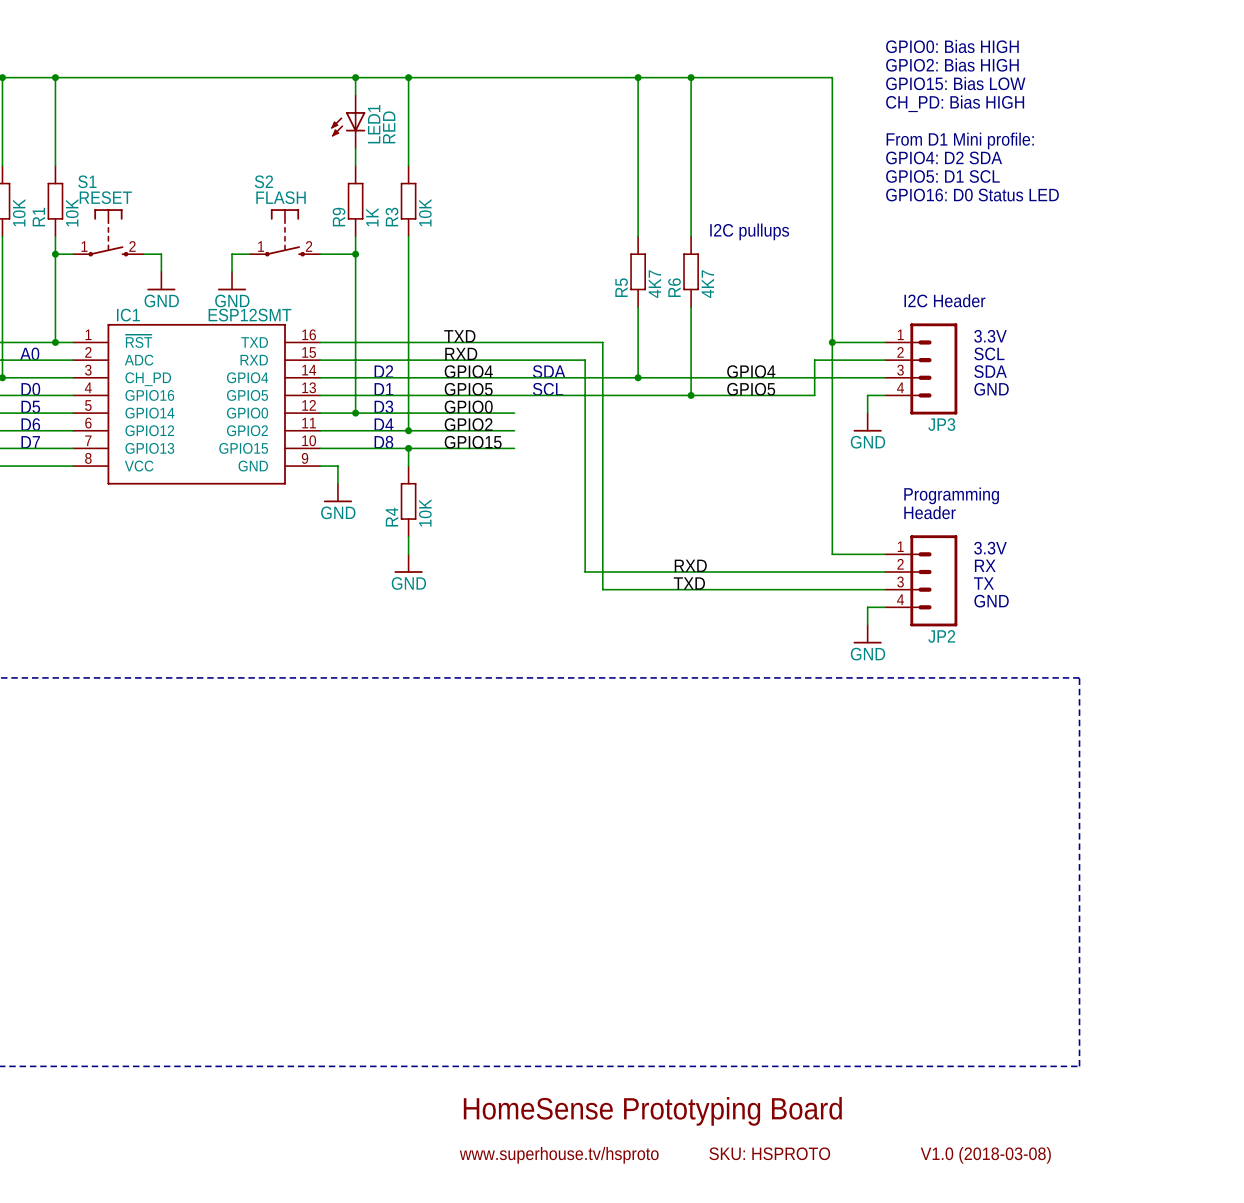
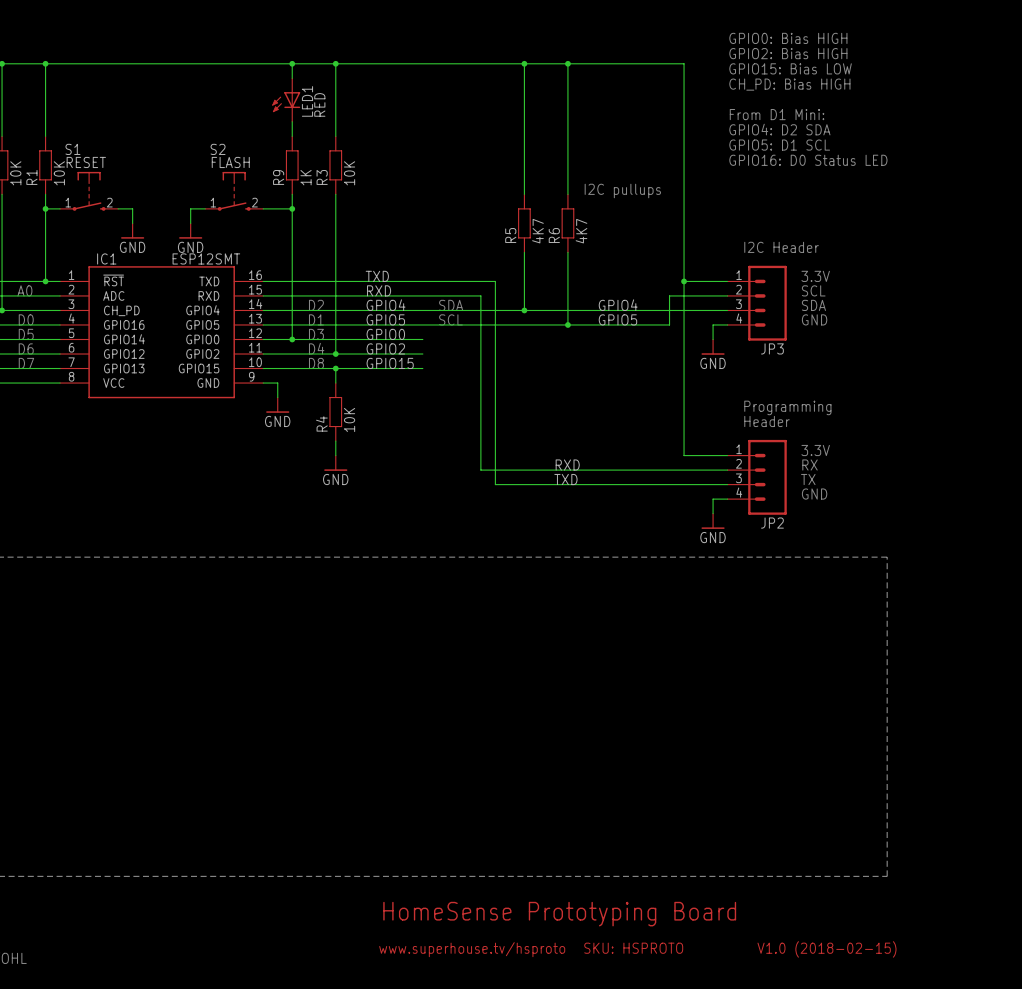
text: From D1 Mini profile: (960, 140) -> From D1 Mini: (777, 114)
text: V1.0 (2018-03-08) (985, 1155) -> V1.0 (2018-02-15) (826, 949)

